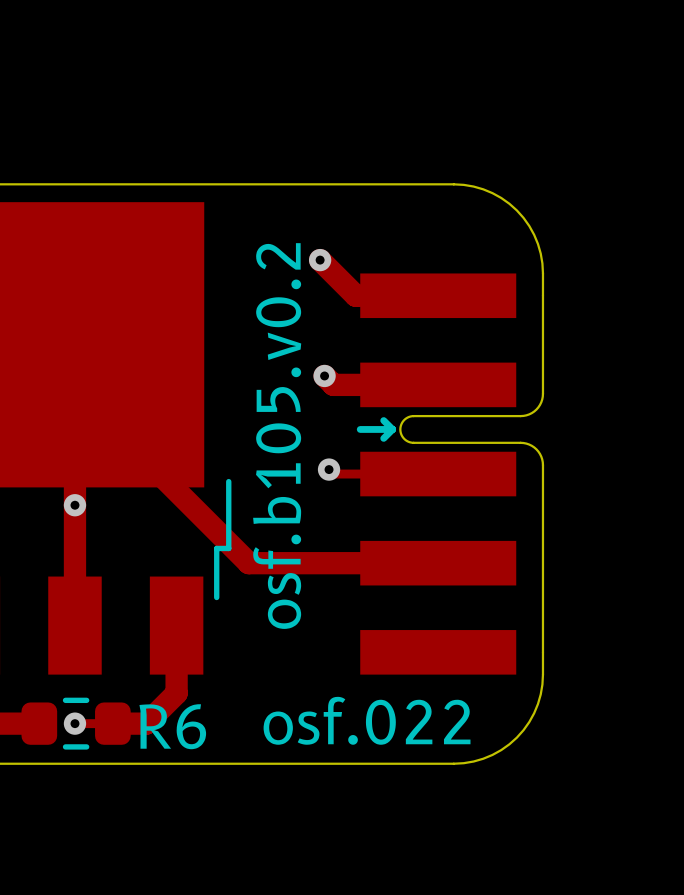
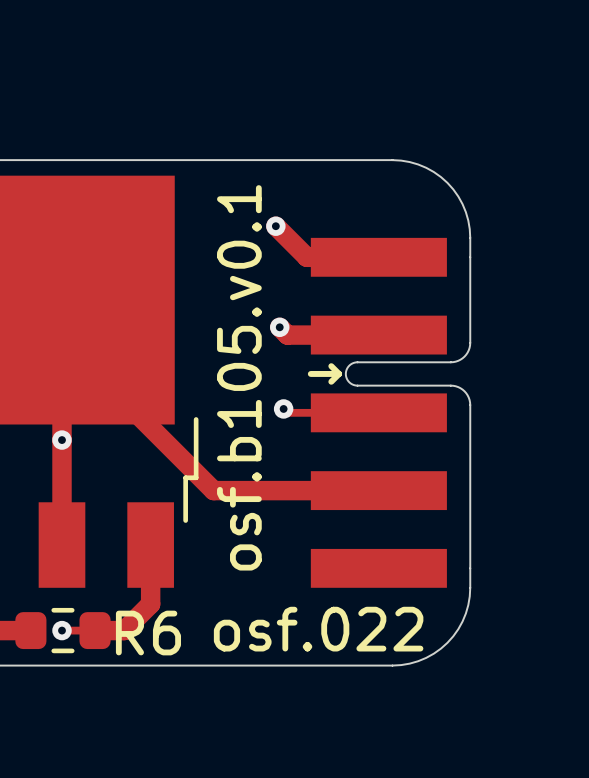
text: osf.b105.v0.2 (277, 436) -> osf.b105.v0.1 (239, 377)

